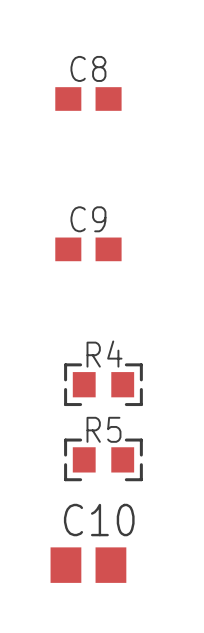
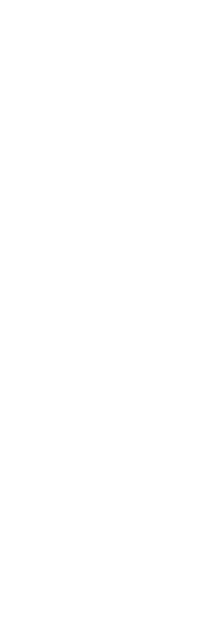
C8: (88, 99) -> none
C9: (88, 249) -> none
R4: (103, 384) -> none
R5: (103, 459) -> none
C10: (88, 565) -> none

